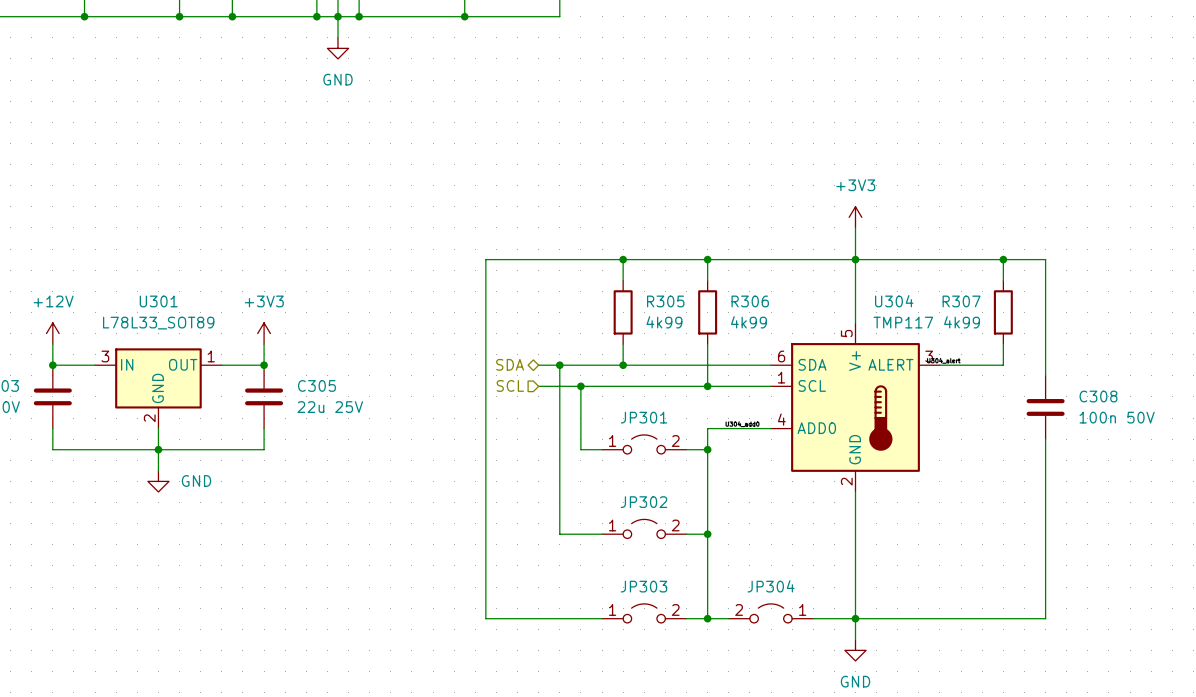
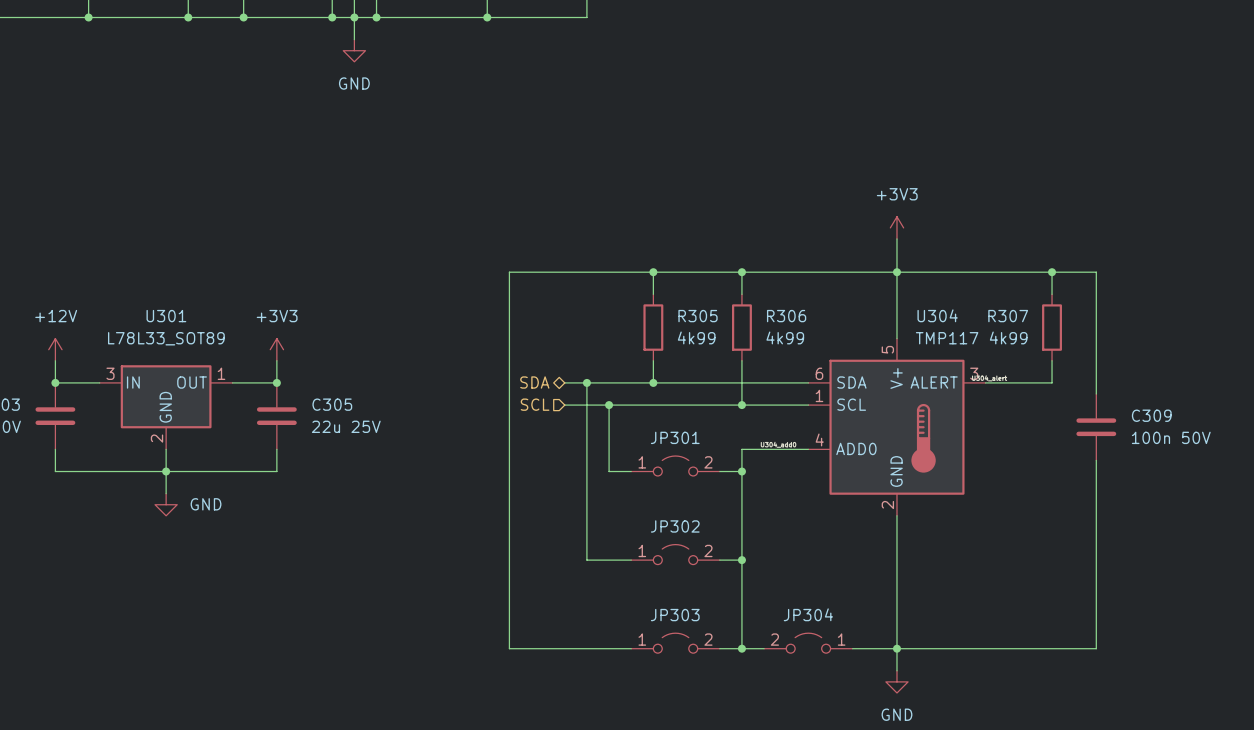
C308 name: C308 (1098, 396) -> C309 (1151, 415)

